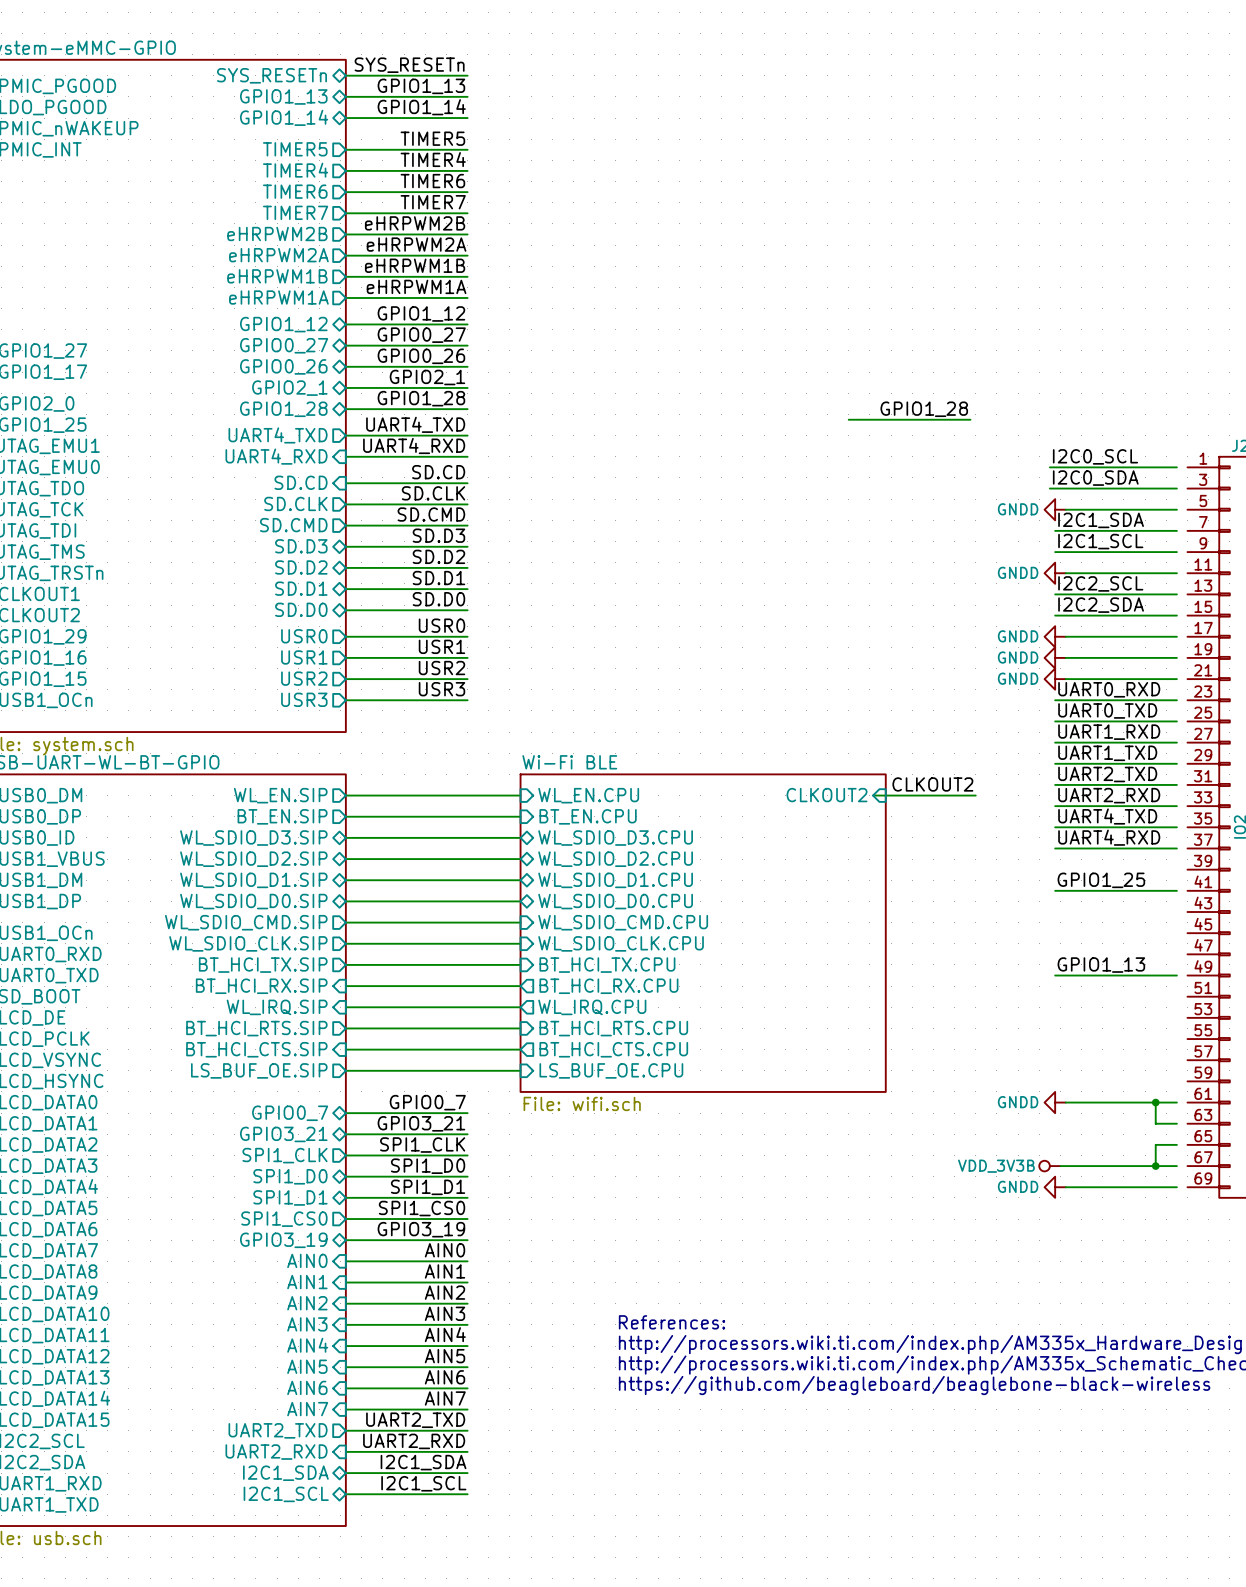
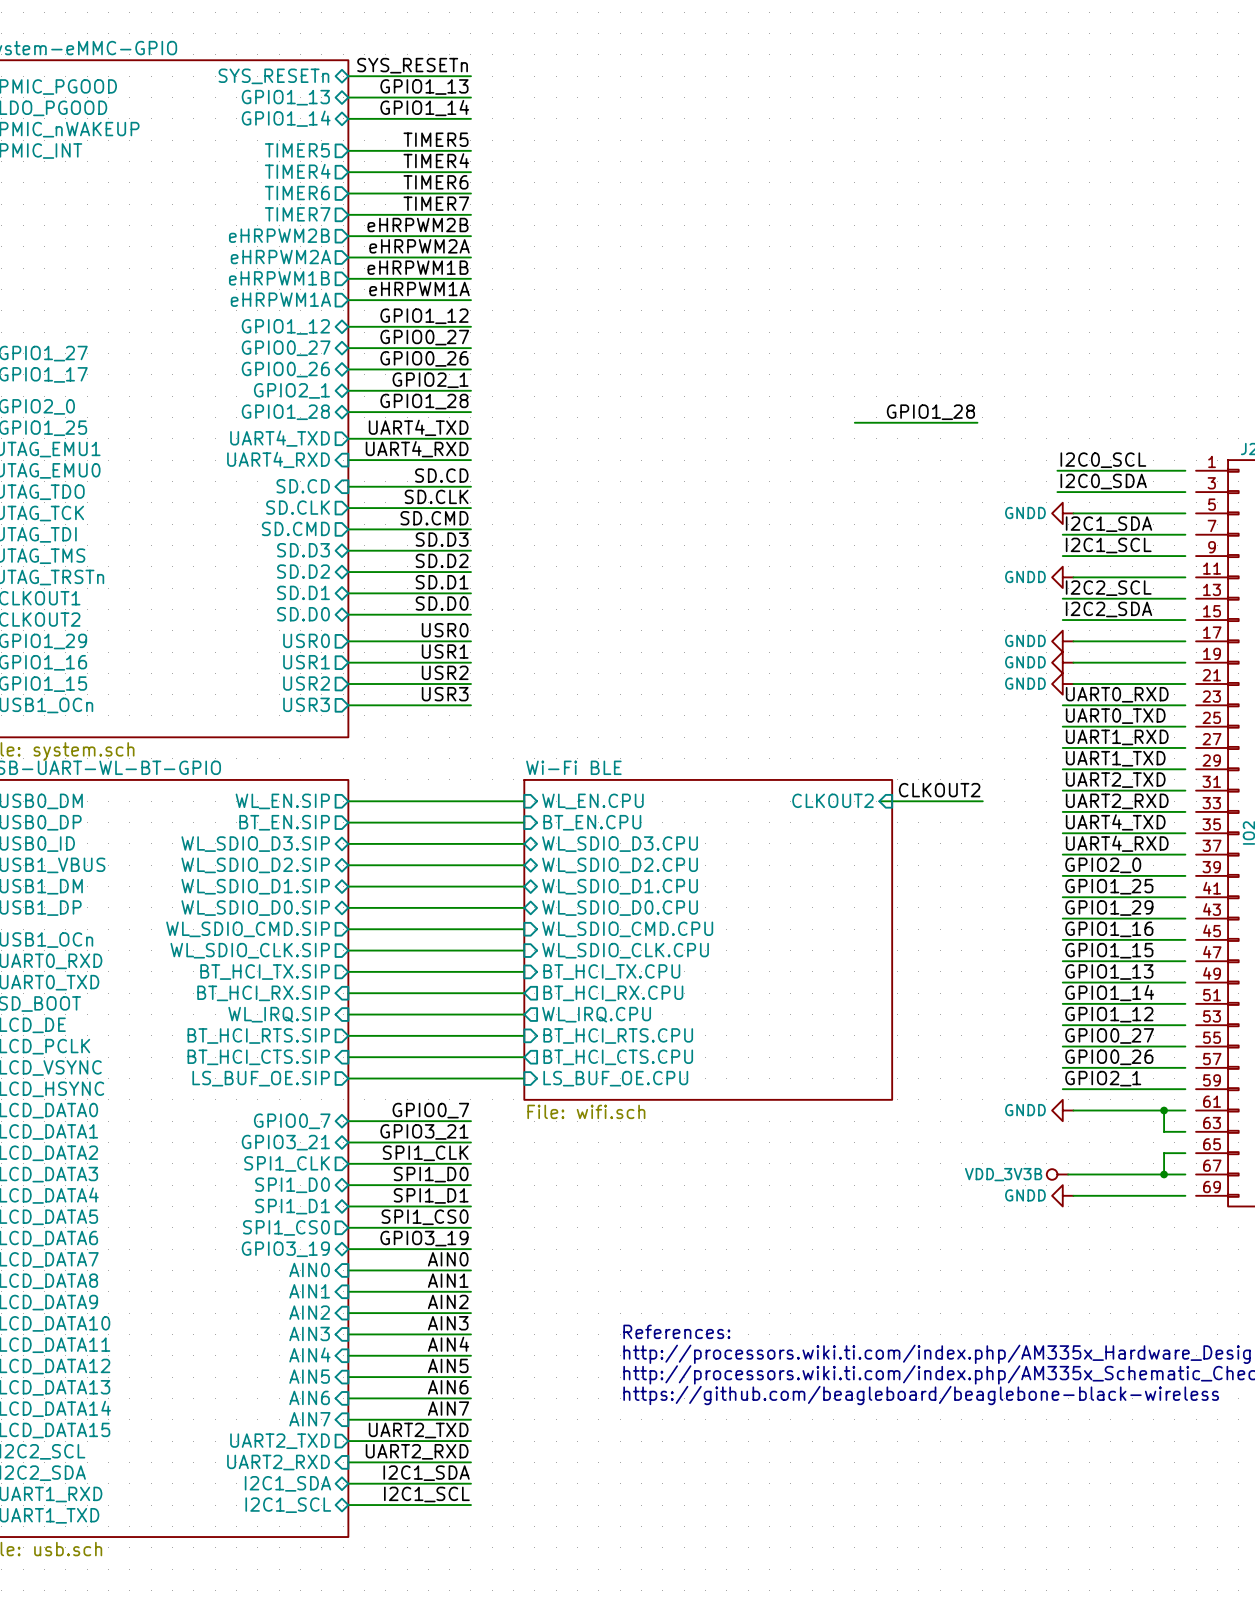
label: none -> GPIO2_0 (1103, 865)
wire: none -> (1062, 875) (1185, 875)
label: none -> GPIO1_29 (1109, 908)
wire: none -> (1062, 918) (1185, 918)
label: none -> GPIO1_16 (1109, 929)
wire: none -> (1062, 939) (1185, 939)
label: none -> GPIO1_15 (1109, 950)
wire: none -> (1062, 961) (1185, 961)
label: none -> GPIO1_14 (1109, 993)
wire: none -> (1062, 1003) (1185, 1003)
label: none -> GPIO1_12 (1109, 1014)
wire: none -> (1062, 1025) (1185, 1025)
label: none -> GPIO0_27 (1109, 1035)
wire: none -> (1062, 1046) (1185, 1046)
label: none -> GPIO0_26 (1109, 1057)
wire: none -> (1062, 1067) (1185, 1067)
label: none -> GPIO2_1 (1103, 1078)
wire: none -> (1062, 1089) (1185, 1089)

